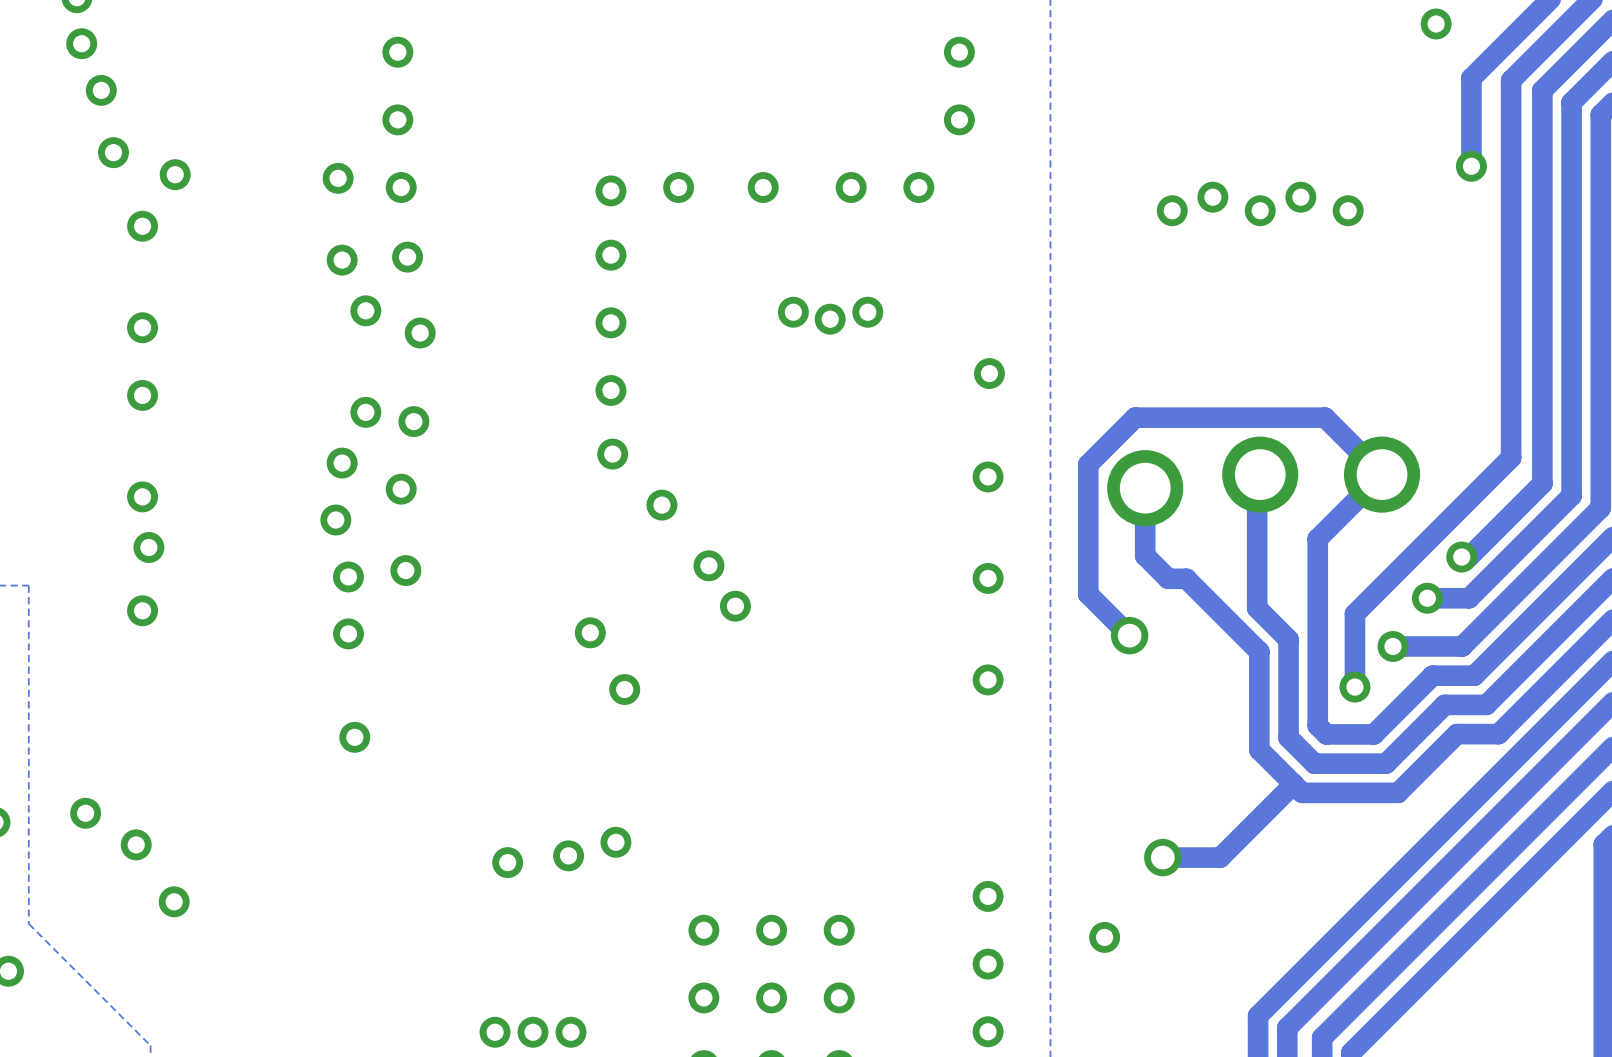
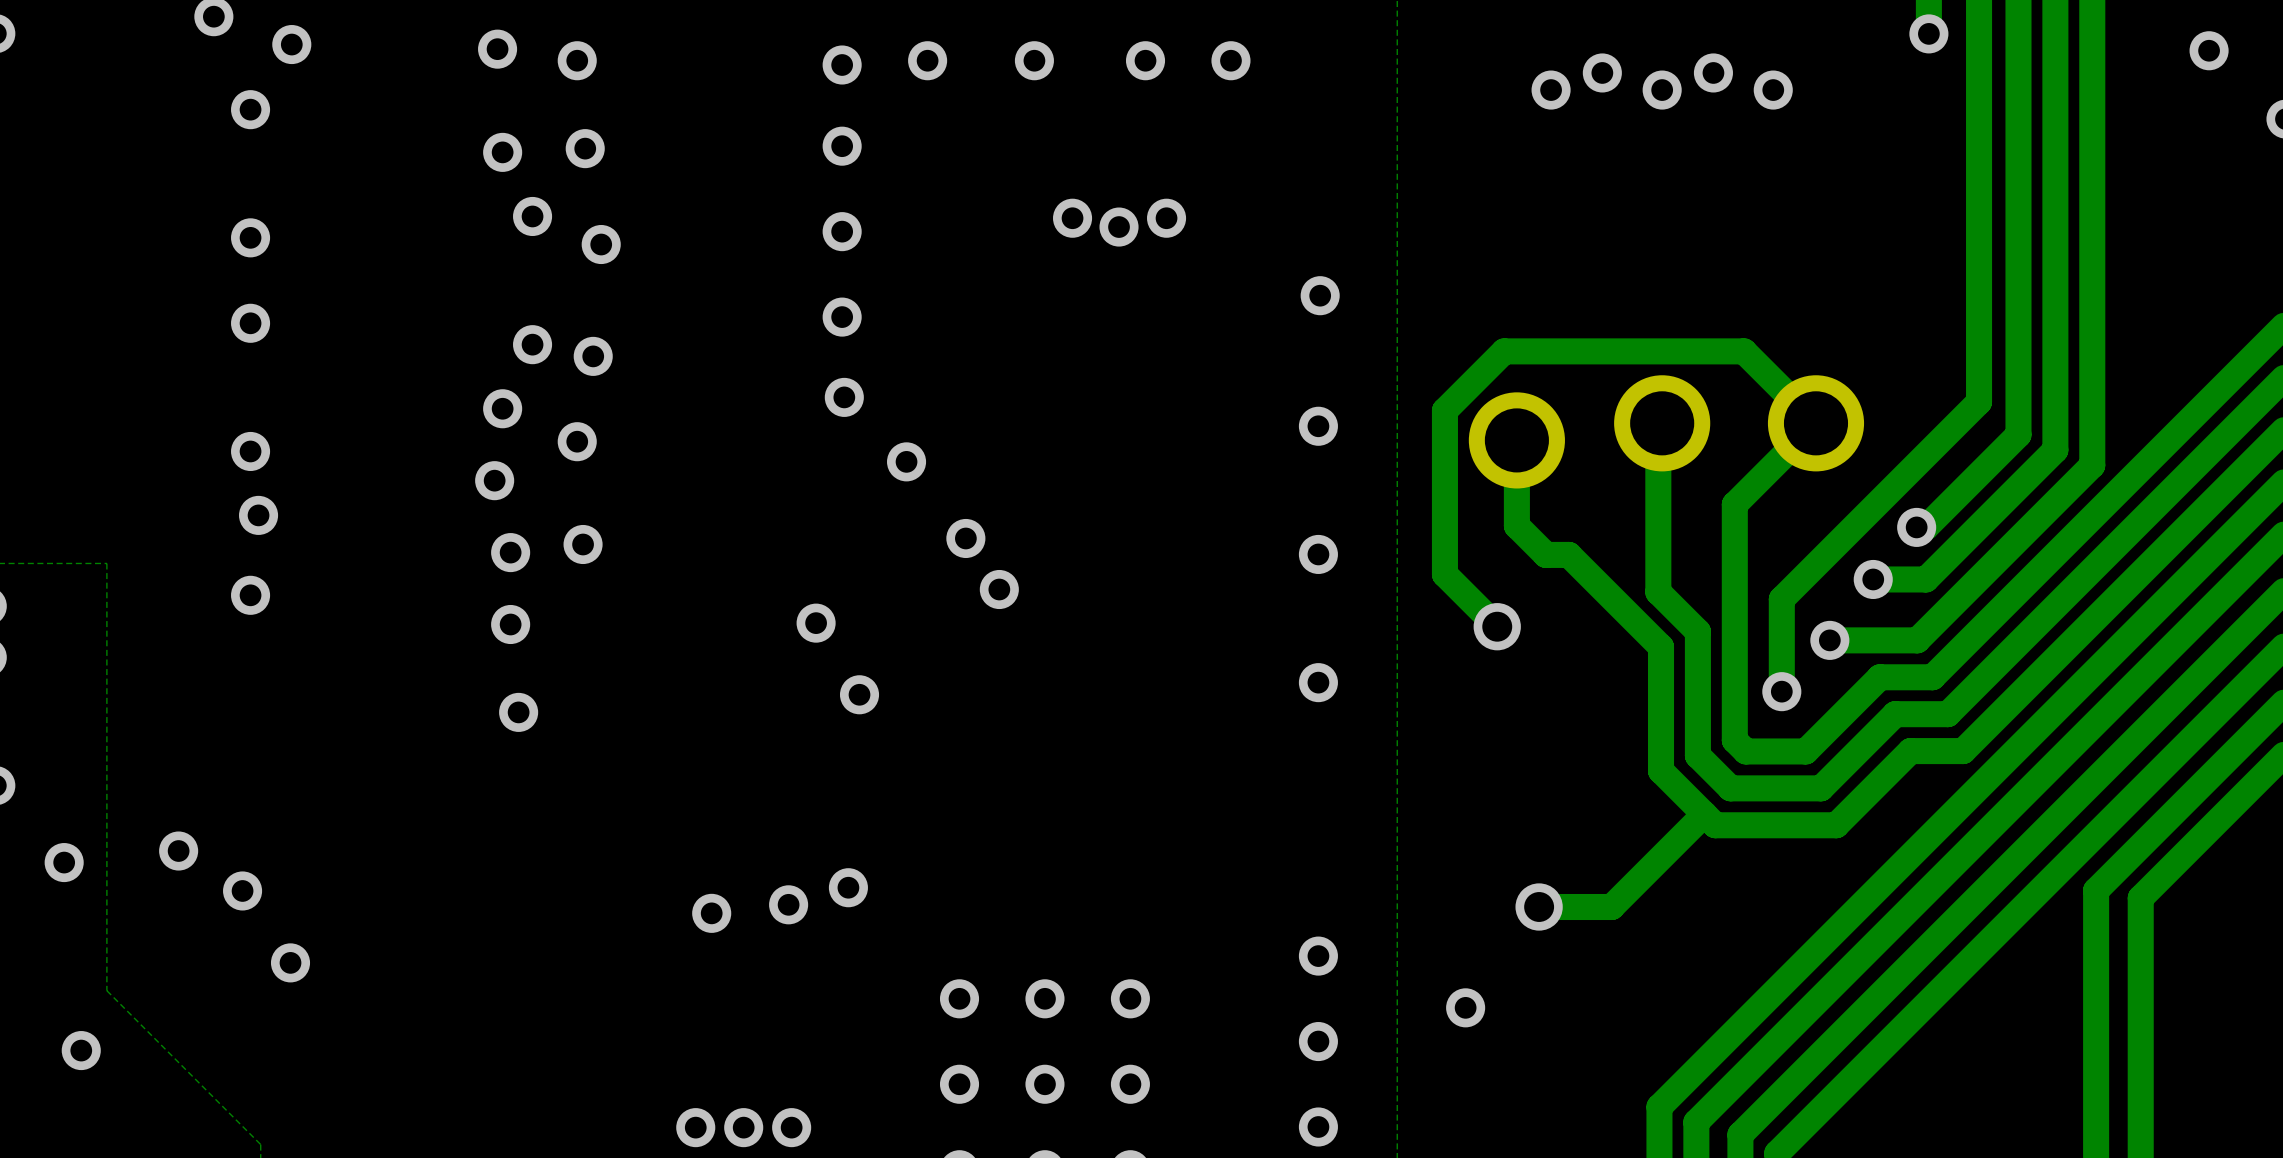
via position: (354, 737) -> (518, 712)

